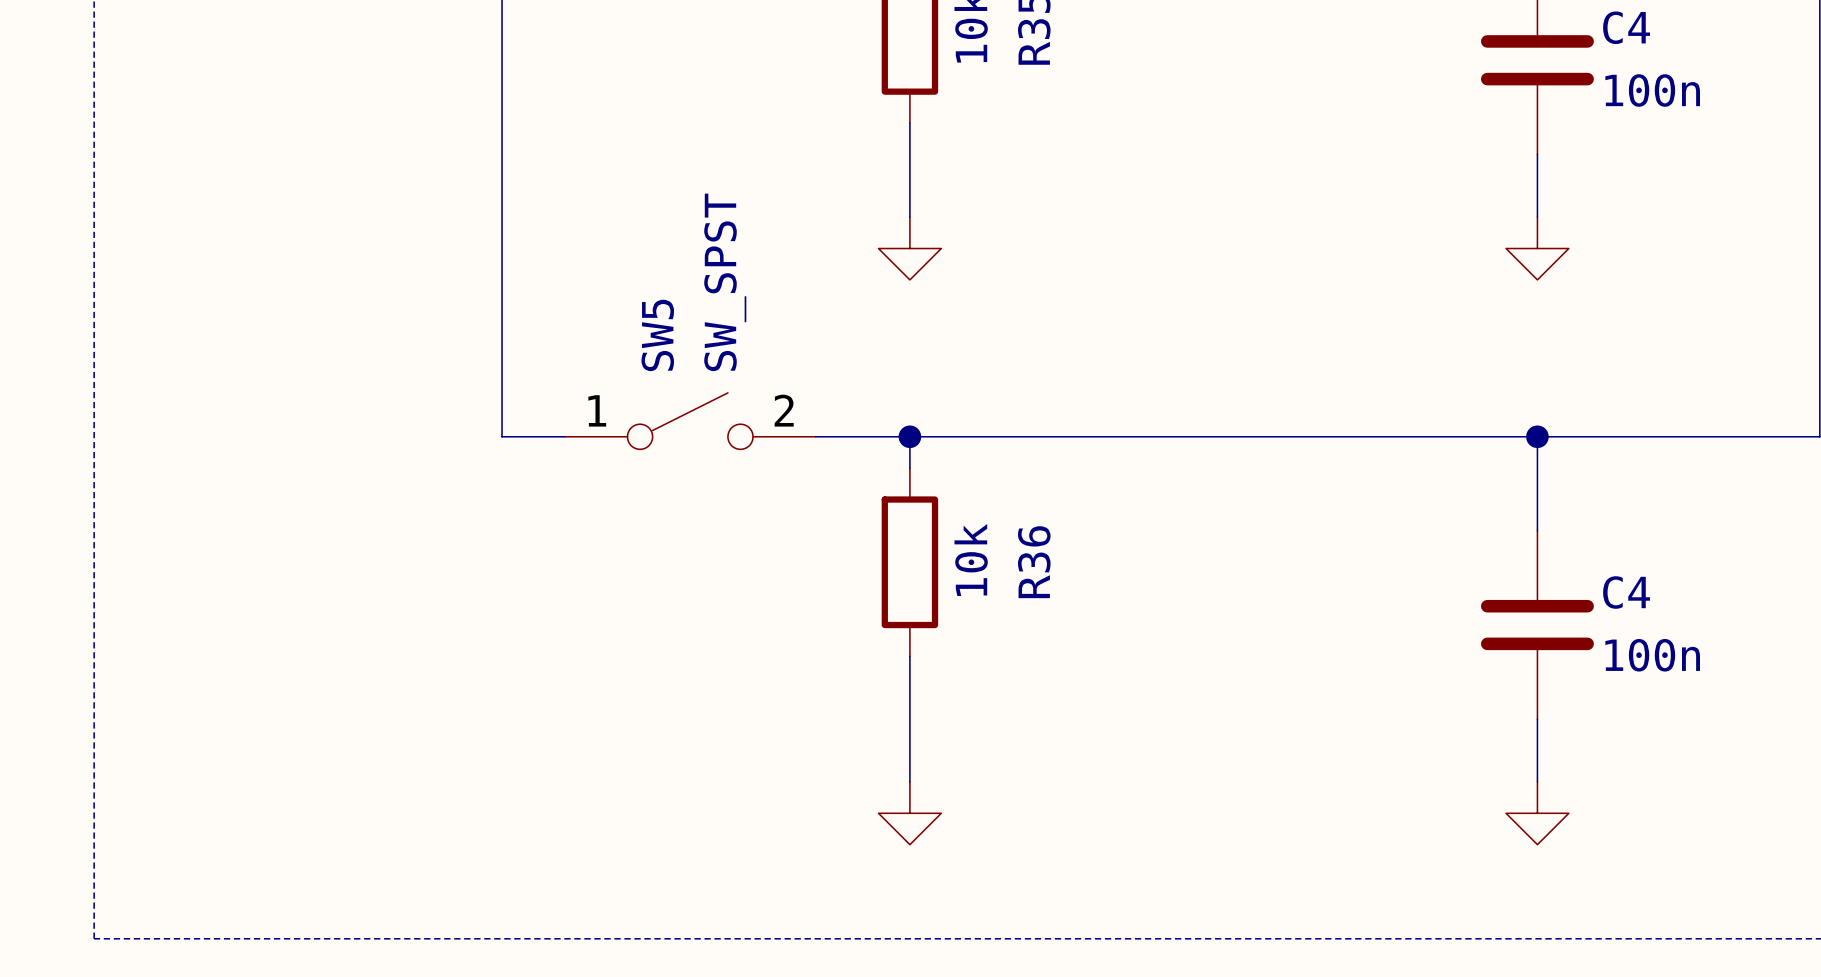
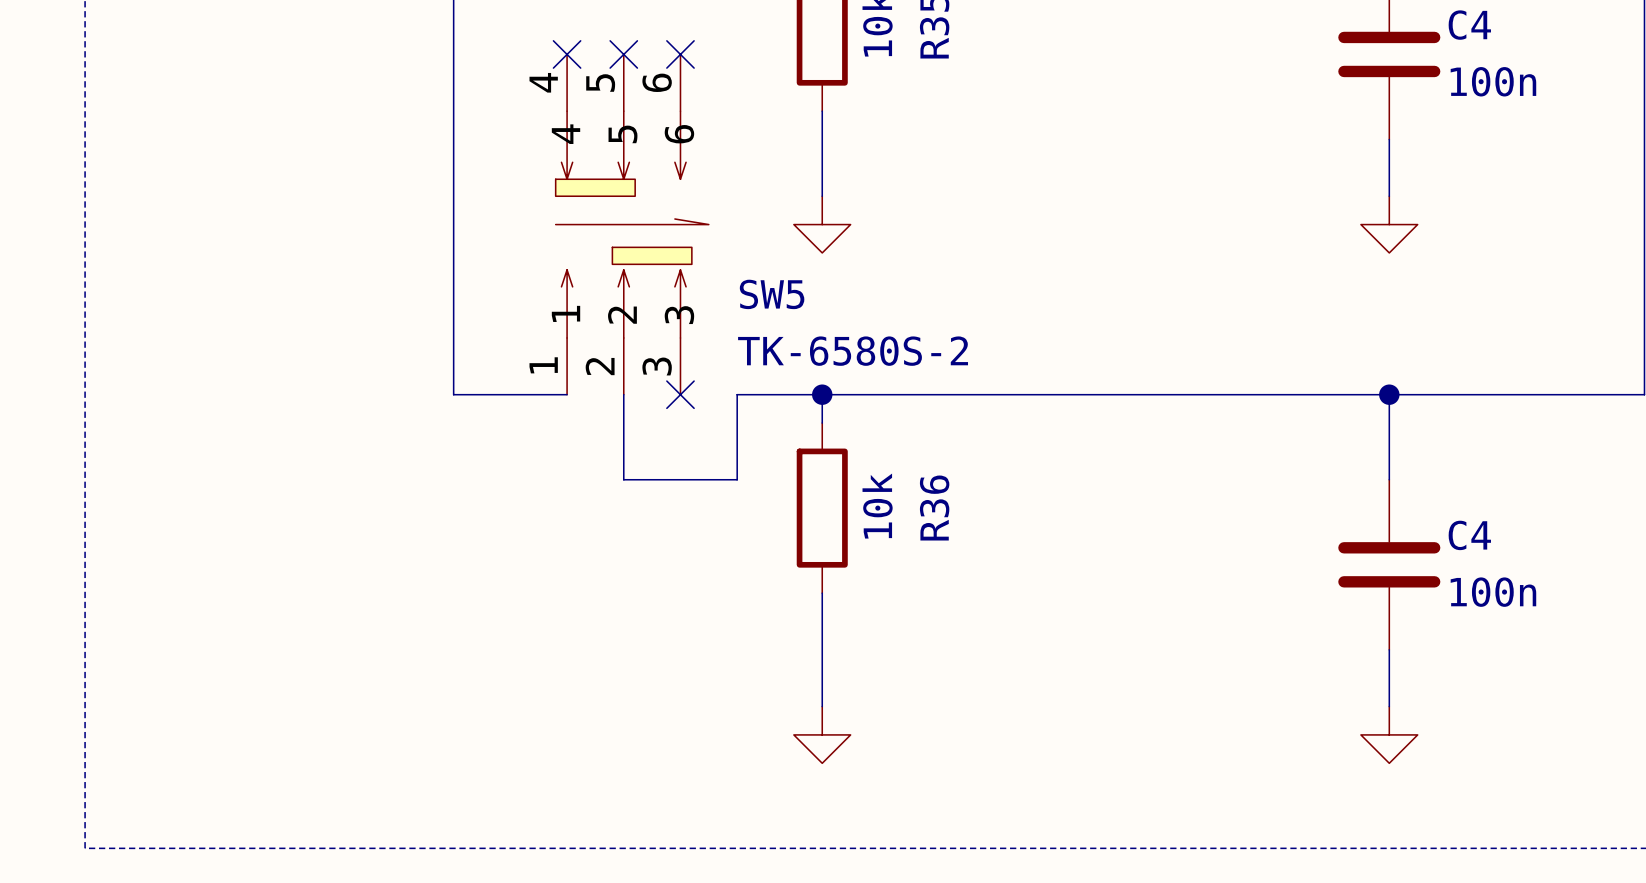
no-connect mark: none -> (567, 54)
no-connect mark: none -> (623, 54)
no-connect mark: none -> (680, 54)
SW5 value: SW_SPST (725, 282) -> TK-6580S-2 (853, 351)
SW5 name position: SW5 (657, 335) -> SW5 (772, 294)
SW5 symbol: [564, 392, 816, 450] -> [555, 54, 709, 395]
wire: none -> (623, 394) (623, 479) (737, 479) (737, 394)
no-connect mark: none -> (680, 394)

